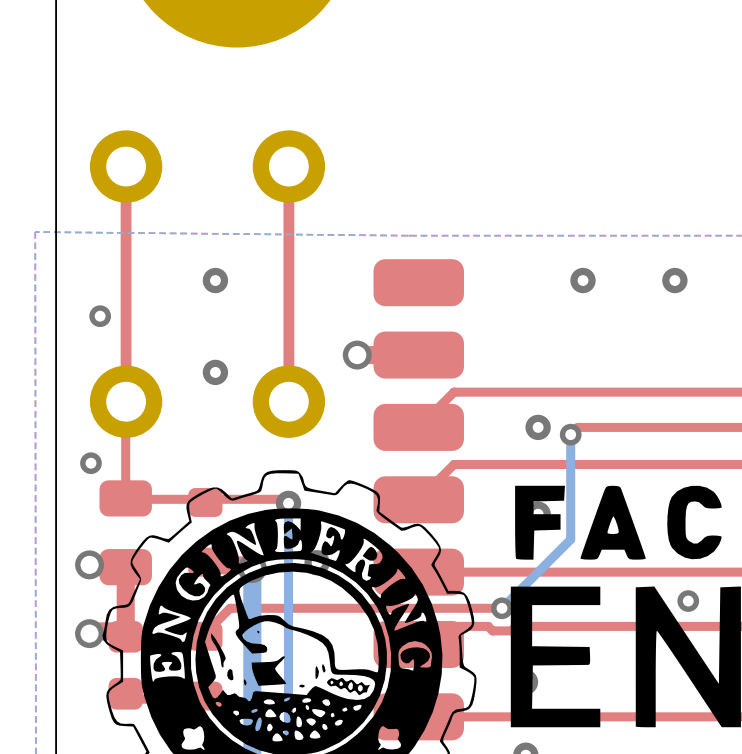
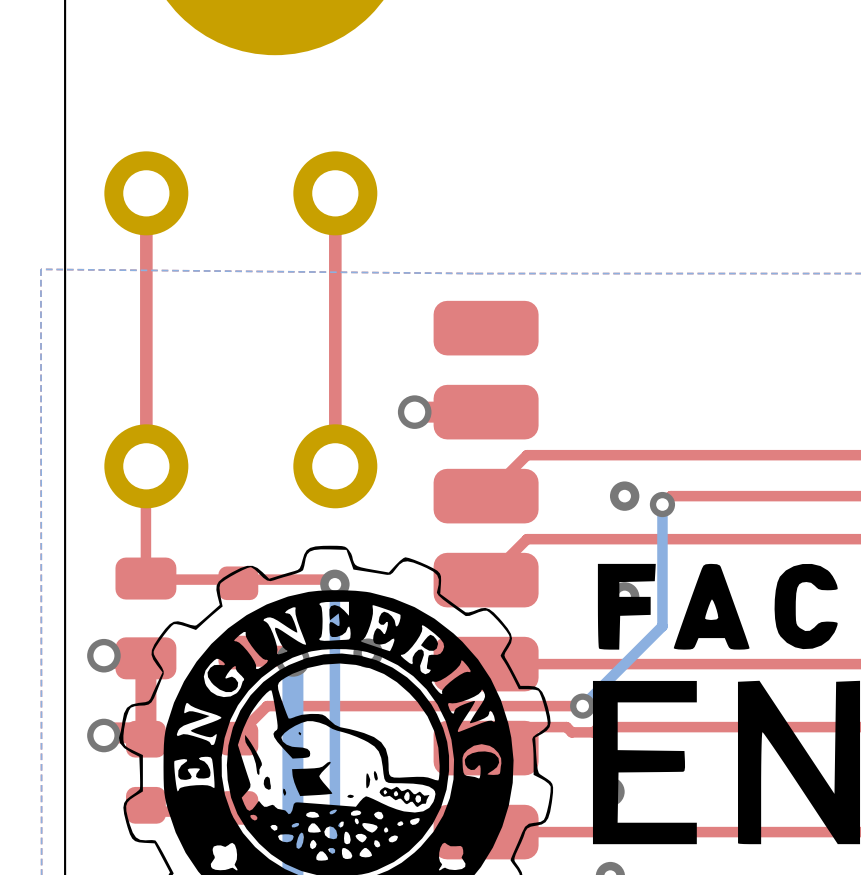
via: (215, 280) -> none
via: (583, 280) -> none
via: (674, 280) -> none
via: (100, 316) -> none
via: (215, 372) -> none
via: (90, 463) -> none
via: (688, 601) -> none

